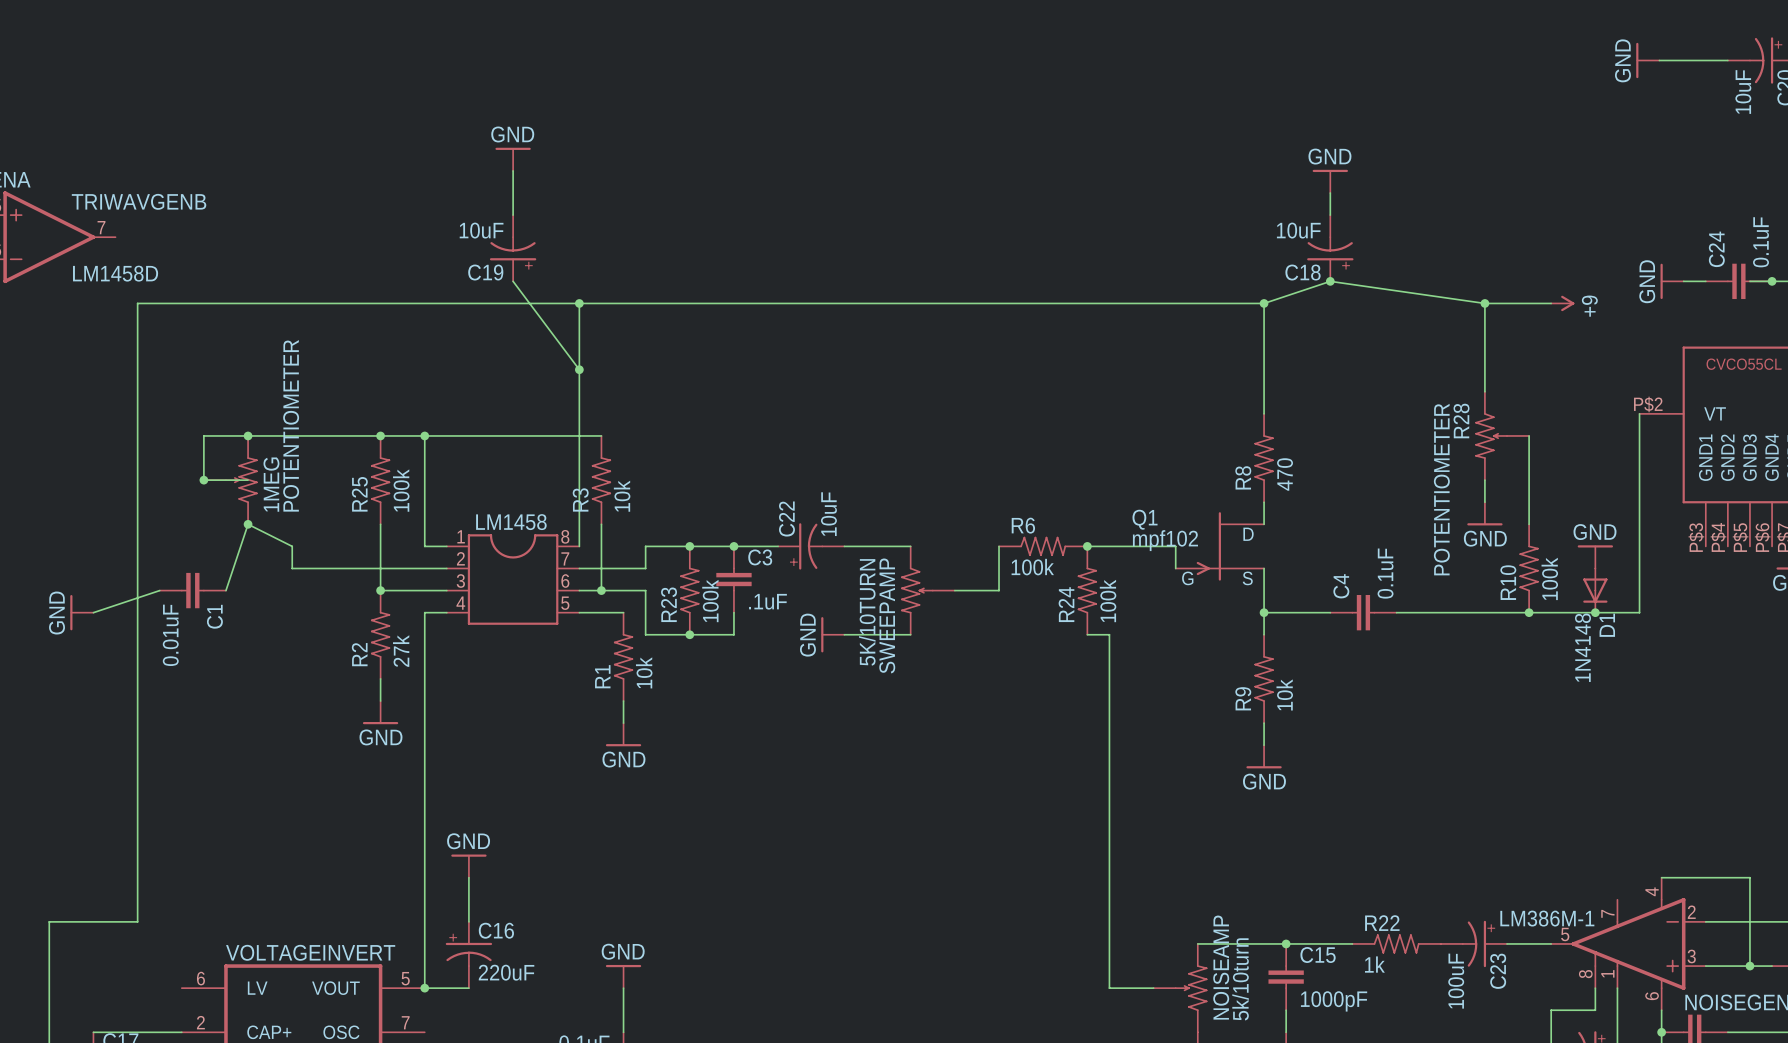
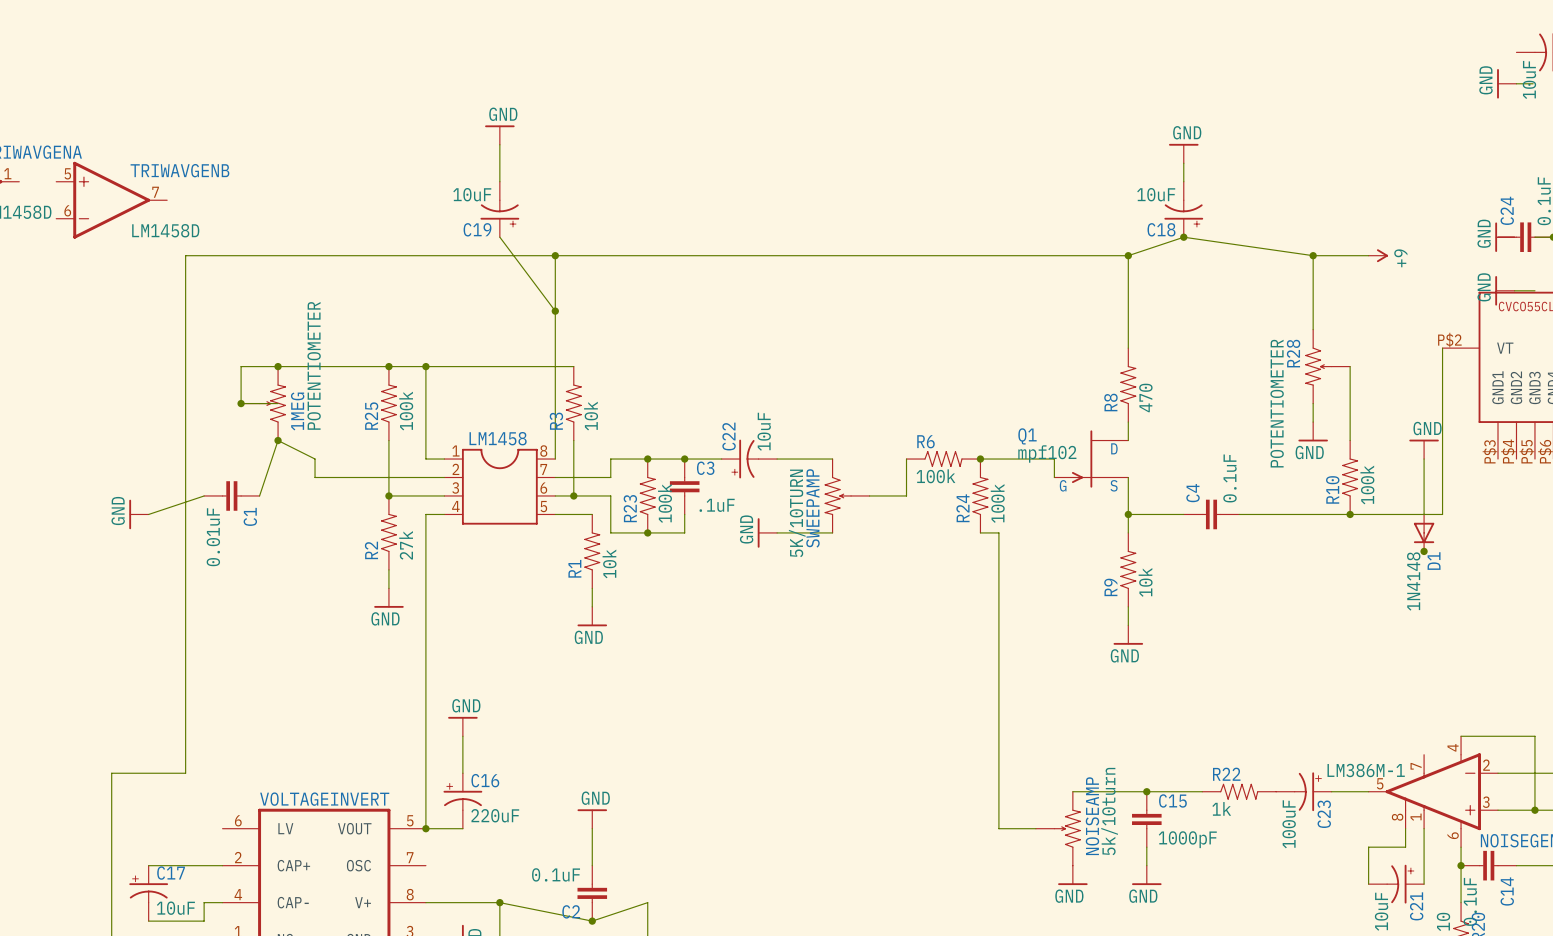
power symbol position: GND (1647, 60) -> GND (1506, 83)
wire: (1659, 60) (1727, 60) -> none
wire: none -> (1516, 83) (1533, 83)
power symbol: GND (1672, 281) -> none
wire: (1683, 281) (1705, 281) -> none
power symbol: none -> GND (1504, 237)
power symbol: none -> GND (1504, 290)
wire: none -> (1514, 290) (1534, 290)
wire: none -> (1424, 459) (1424, 514)
power symbol position: GND (1595, 556) -> GND (1424, 449)
D1 position: (1595, 590) -> (1424, 532)
junction position: (1595, 612) -> (1424, 551)

